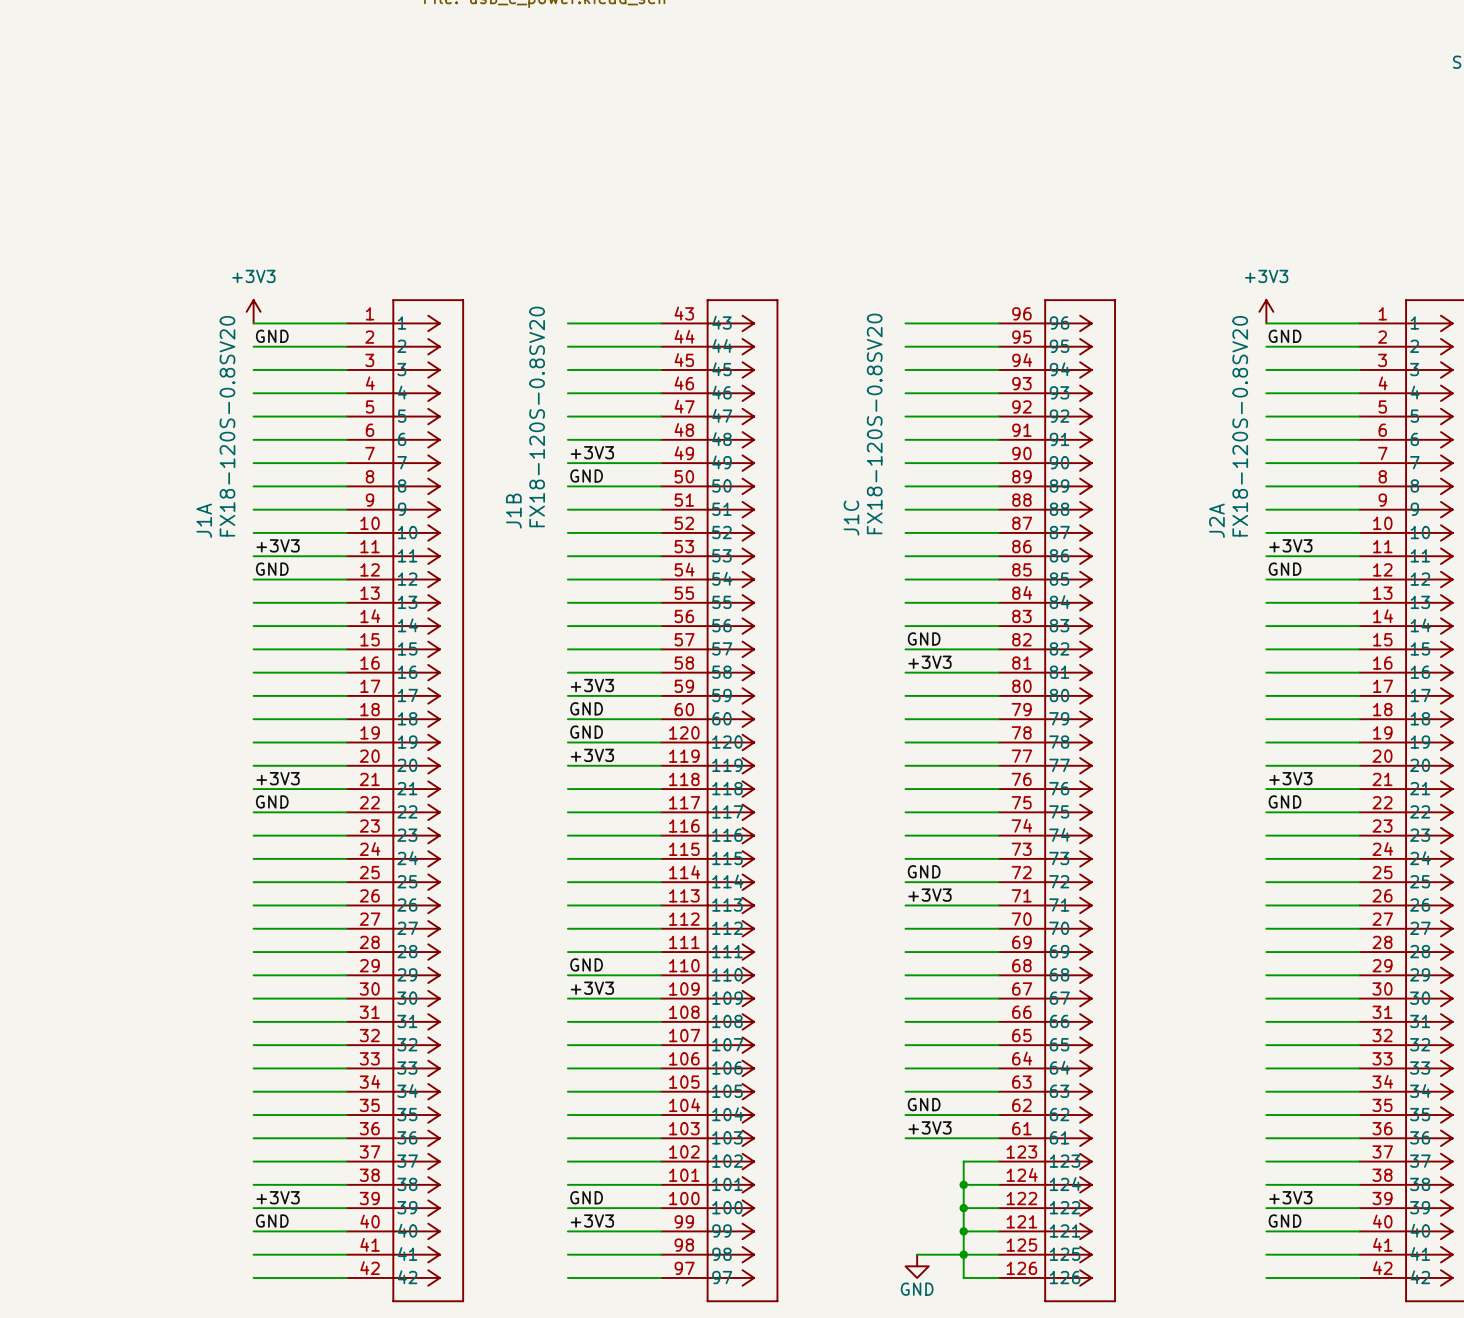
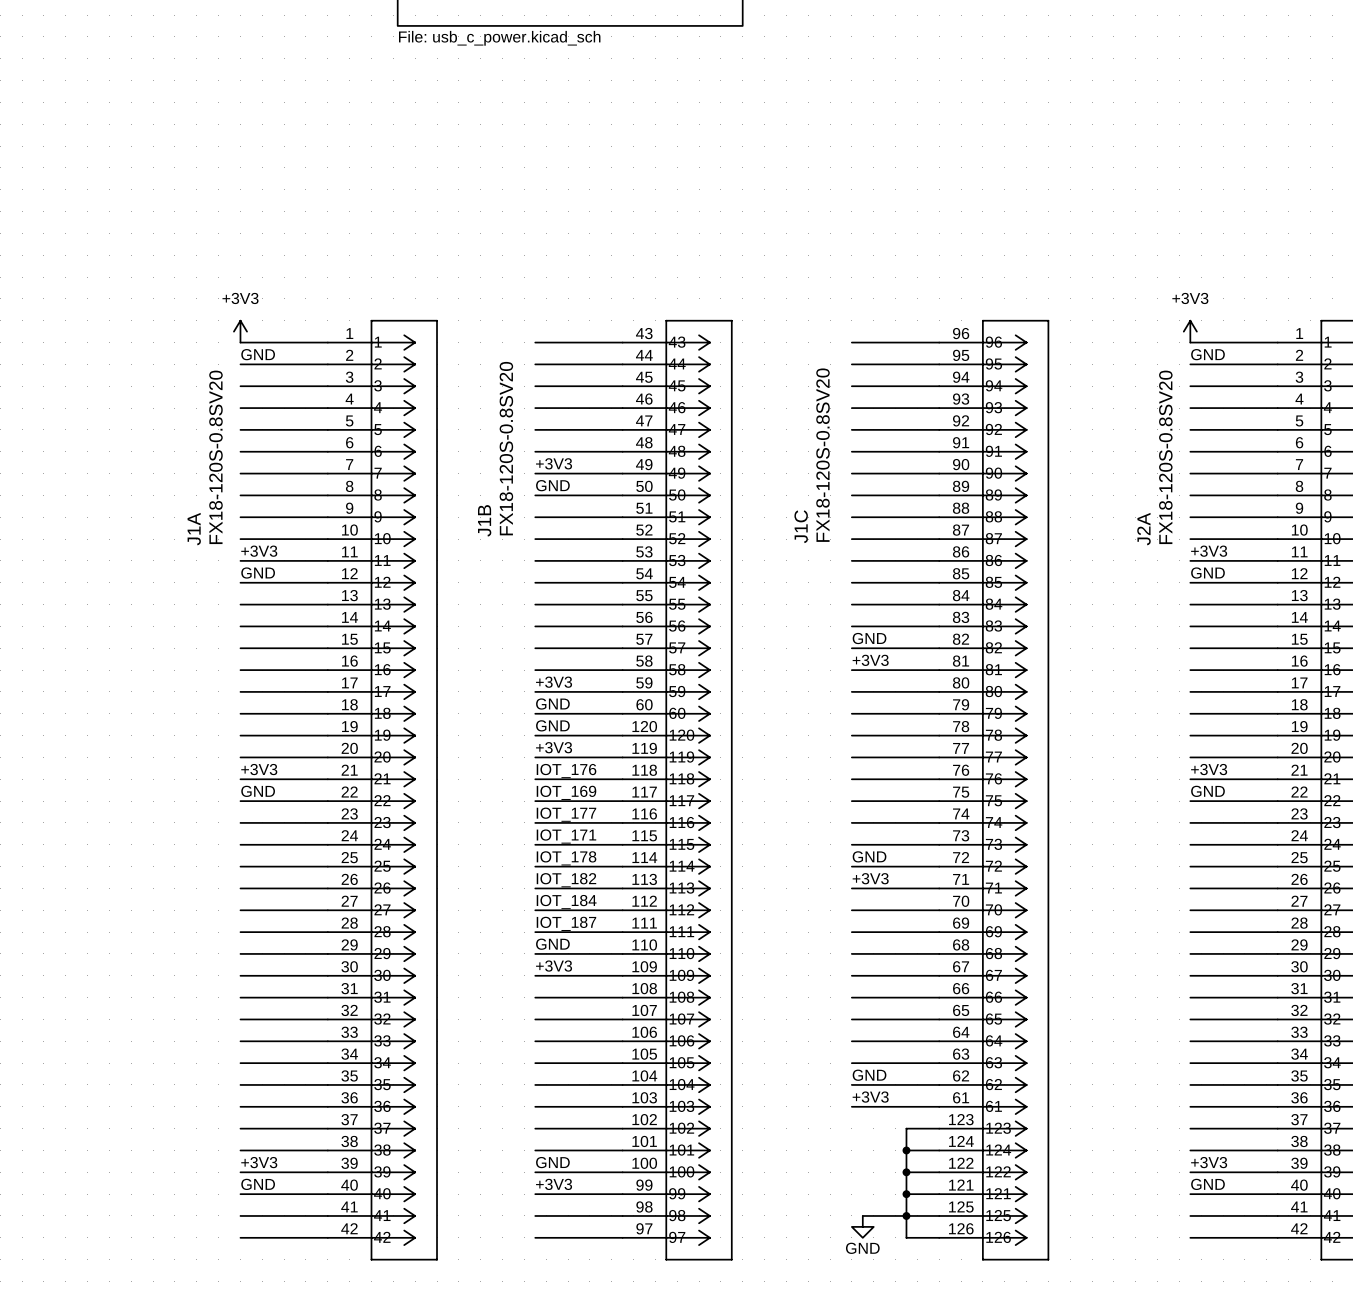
label: none -> IOT_176 (566, 771)
label: none -> IOT_169 (566, 792)
label: none -> IOT_177 (566, 814)
label: none -> IOT_171 (566, 836)
label: none -> IOT_178 (566, 858)
label: none -> IOT_182 (566, 880)
label: none -> IOT_184 (566, 902)
label: none -> IOT_187 (566, 923)

